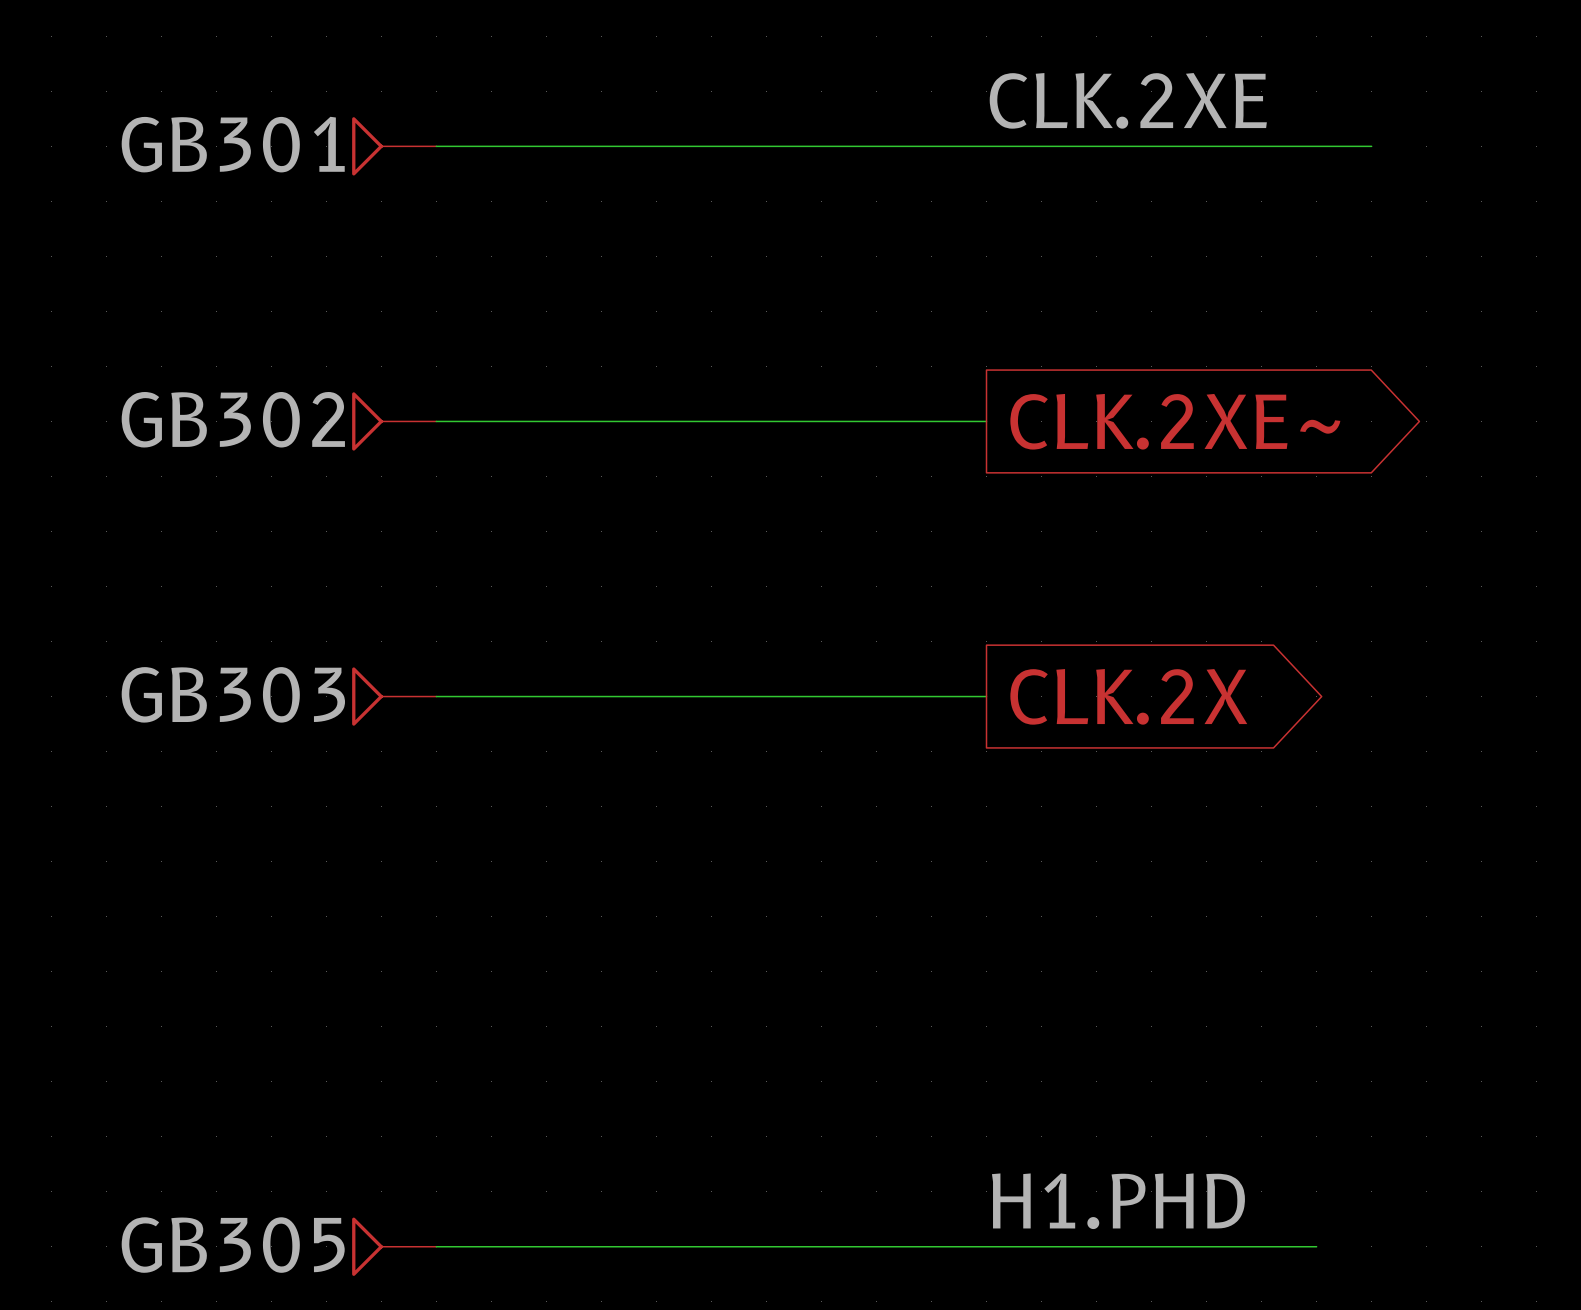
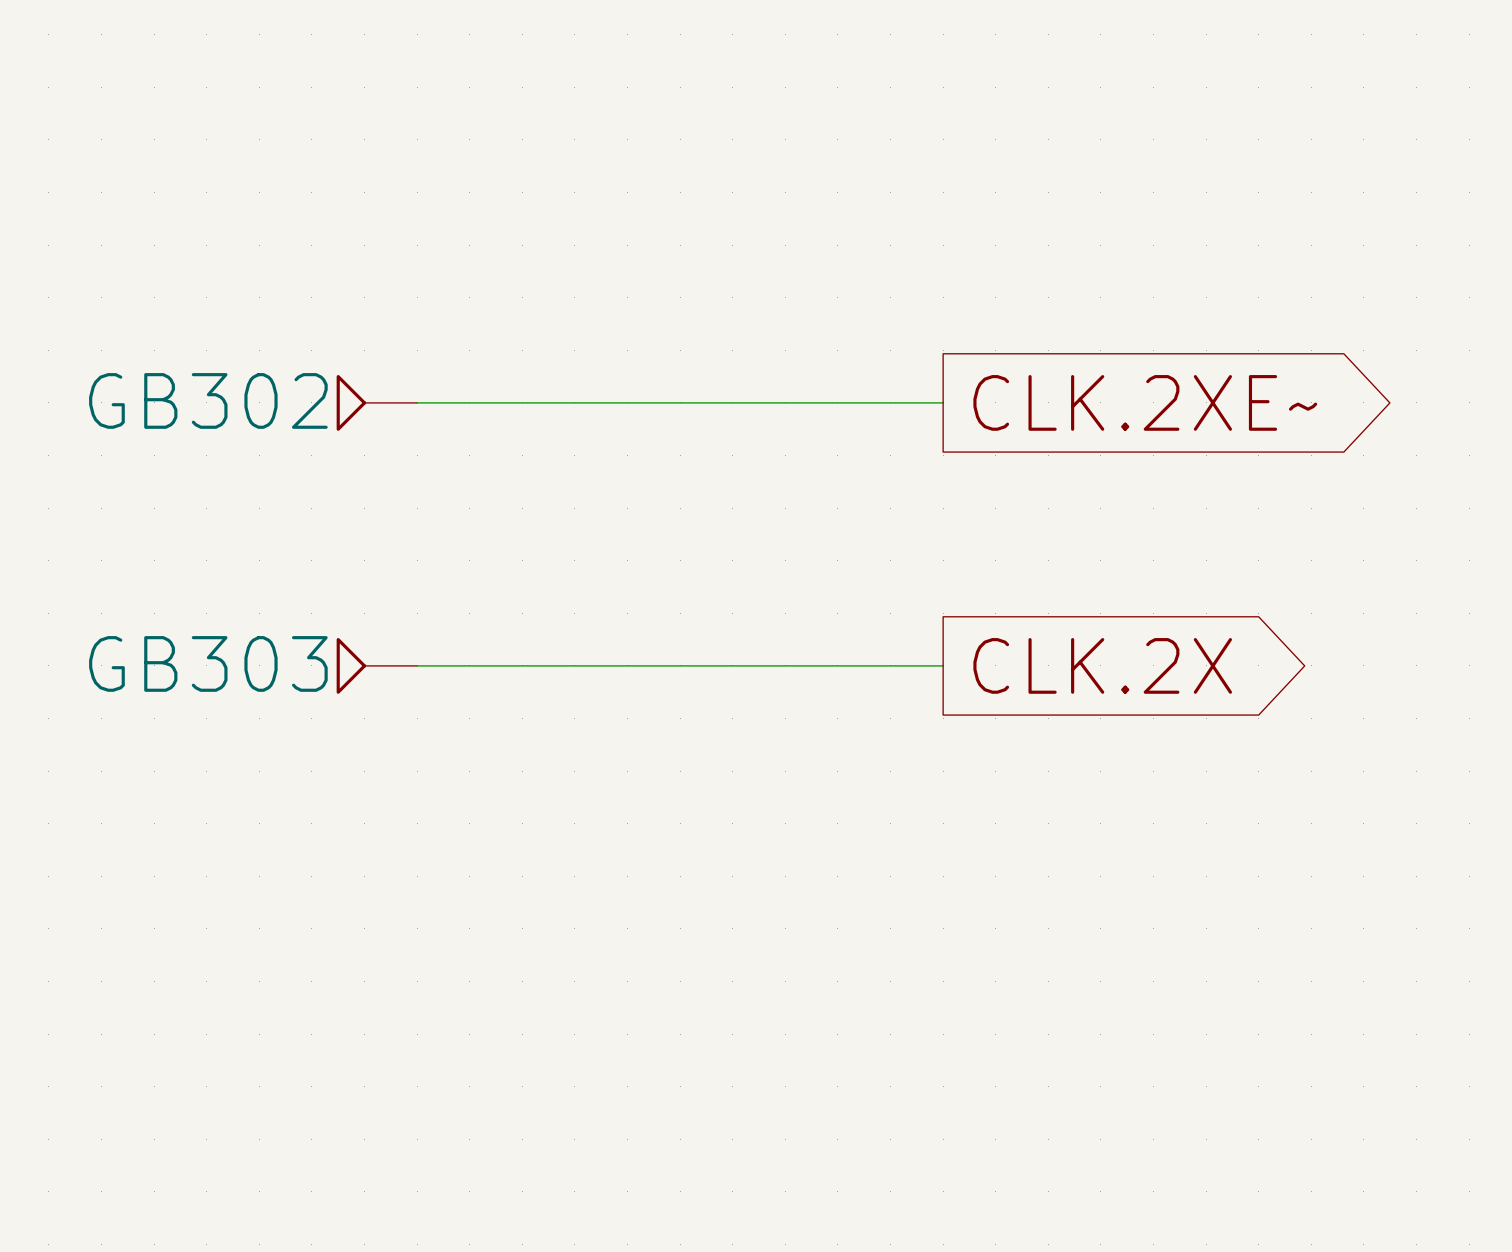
label: CLK.2XE (1128, 100) -> none
GB301: (394, 146) -> none
wire: (436, 146) (1371, 146) -> none
label: H1.PHD (1118, 1201) -> none
GB305: (394, 1246) -> none
wire: (436, 1246) (1316, 1246) -> none

